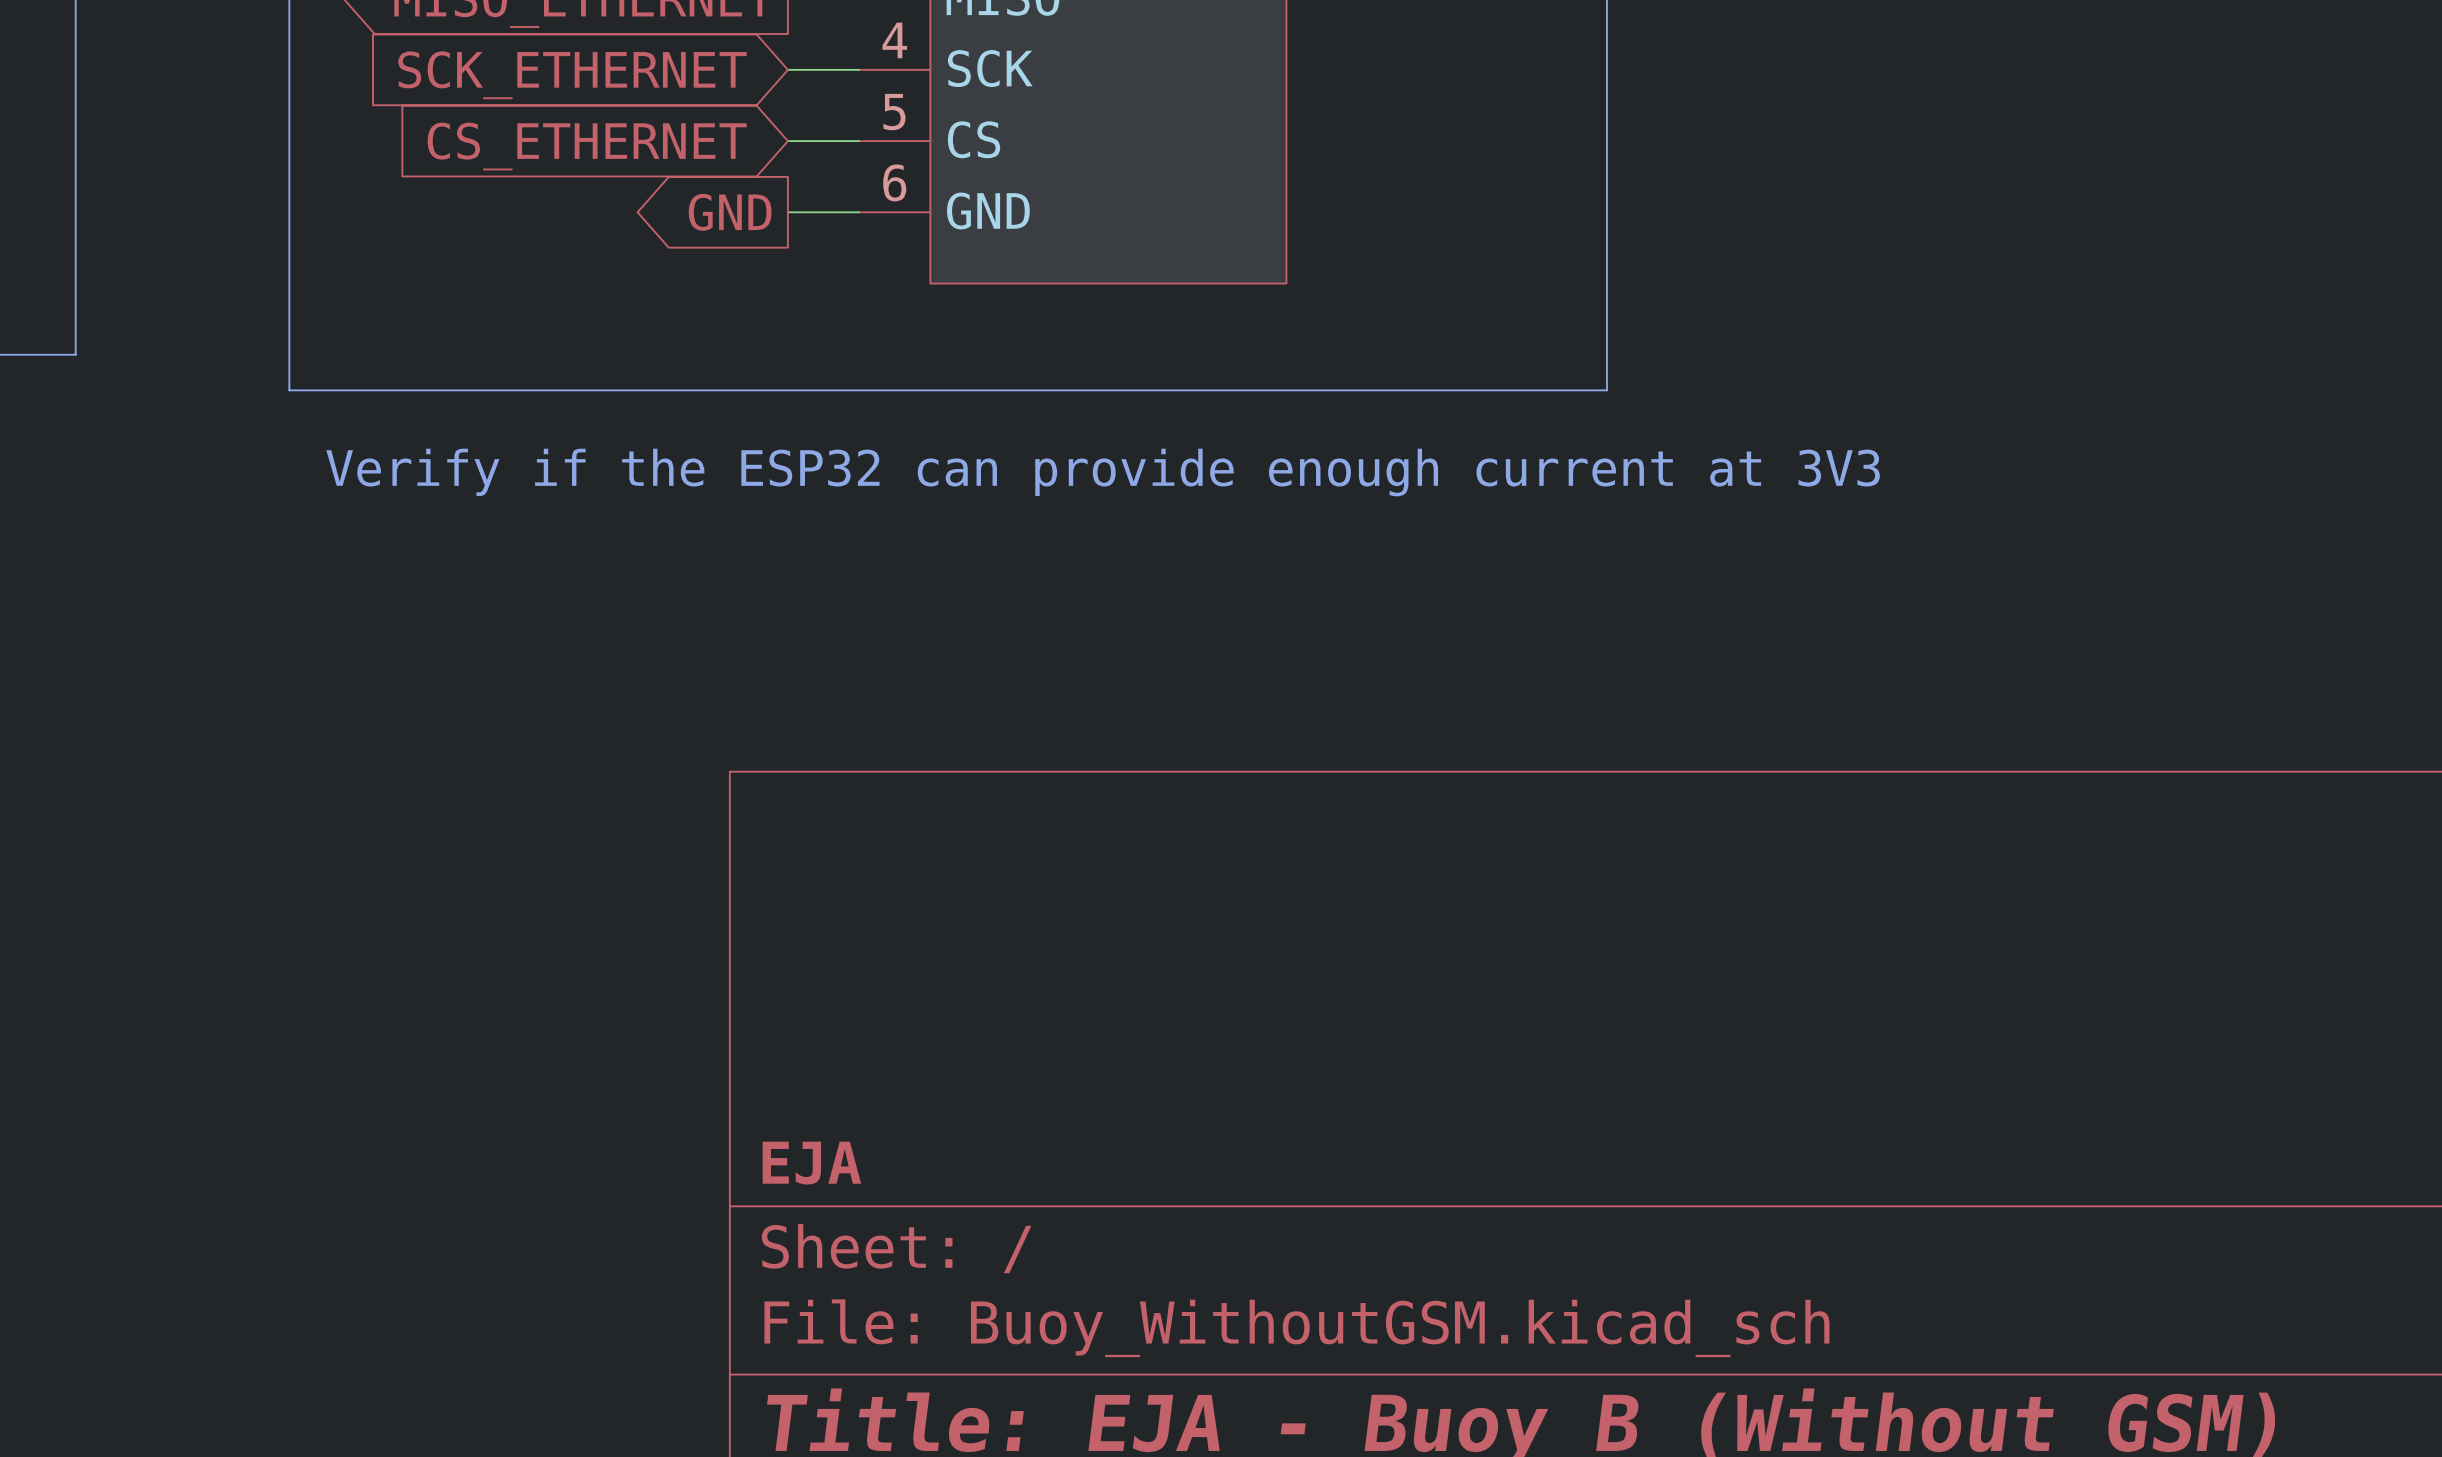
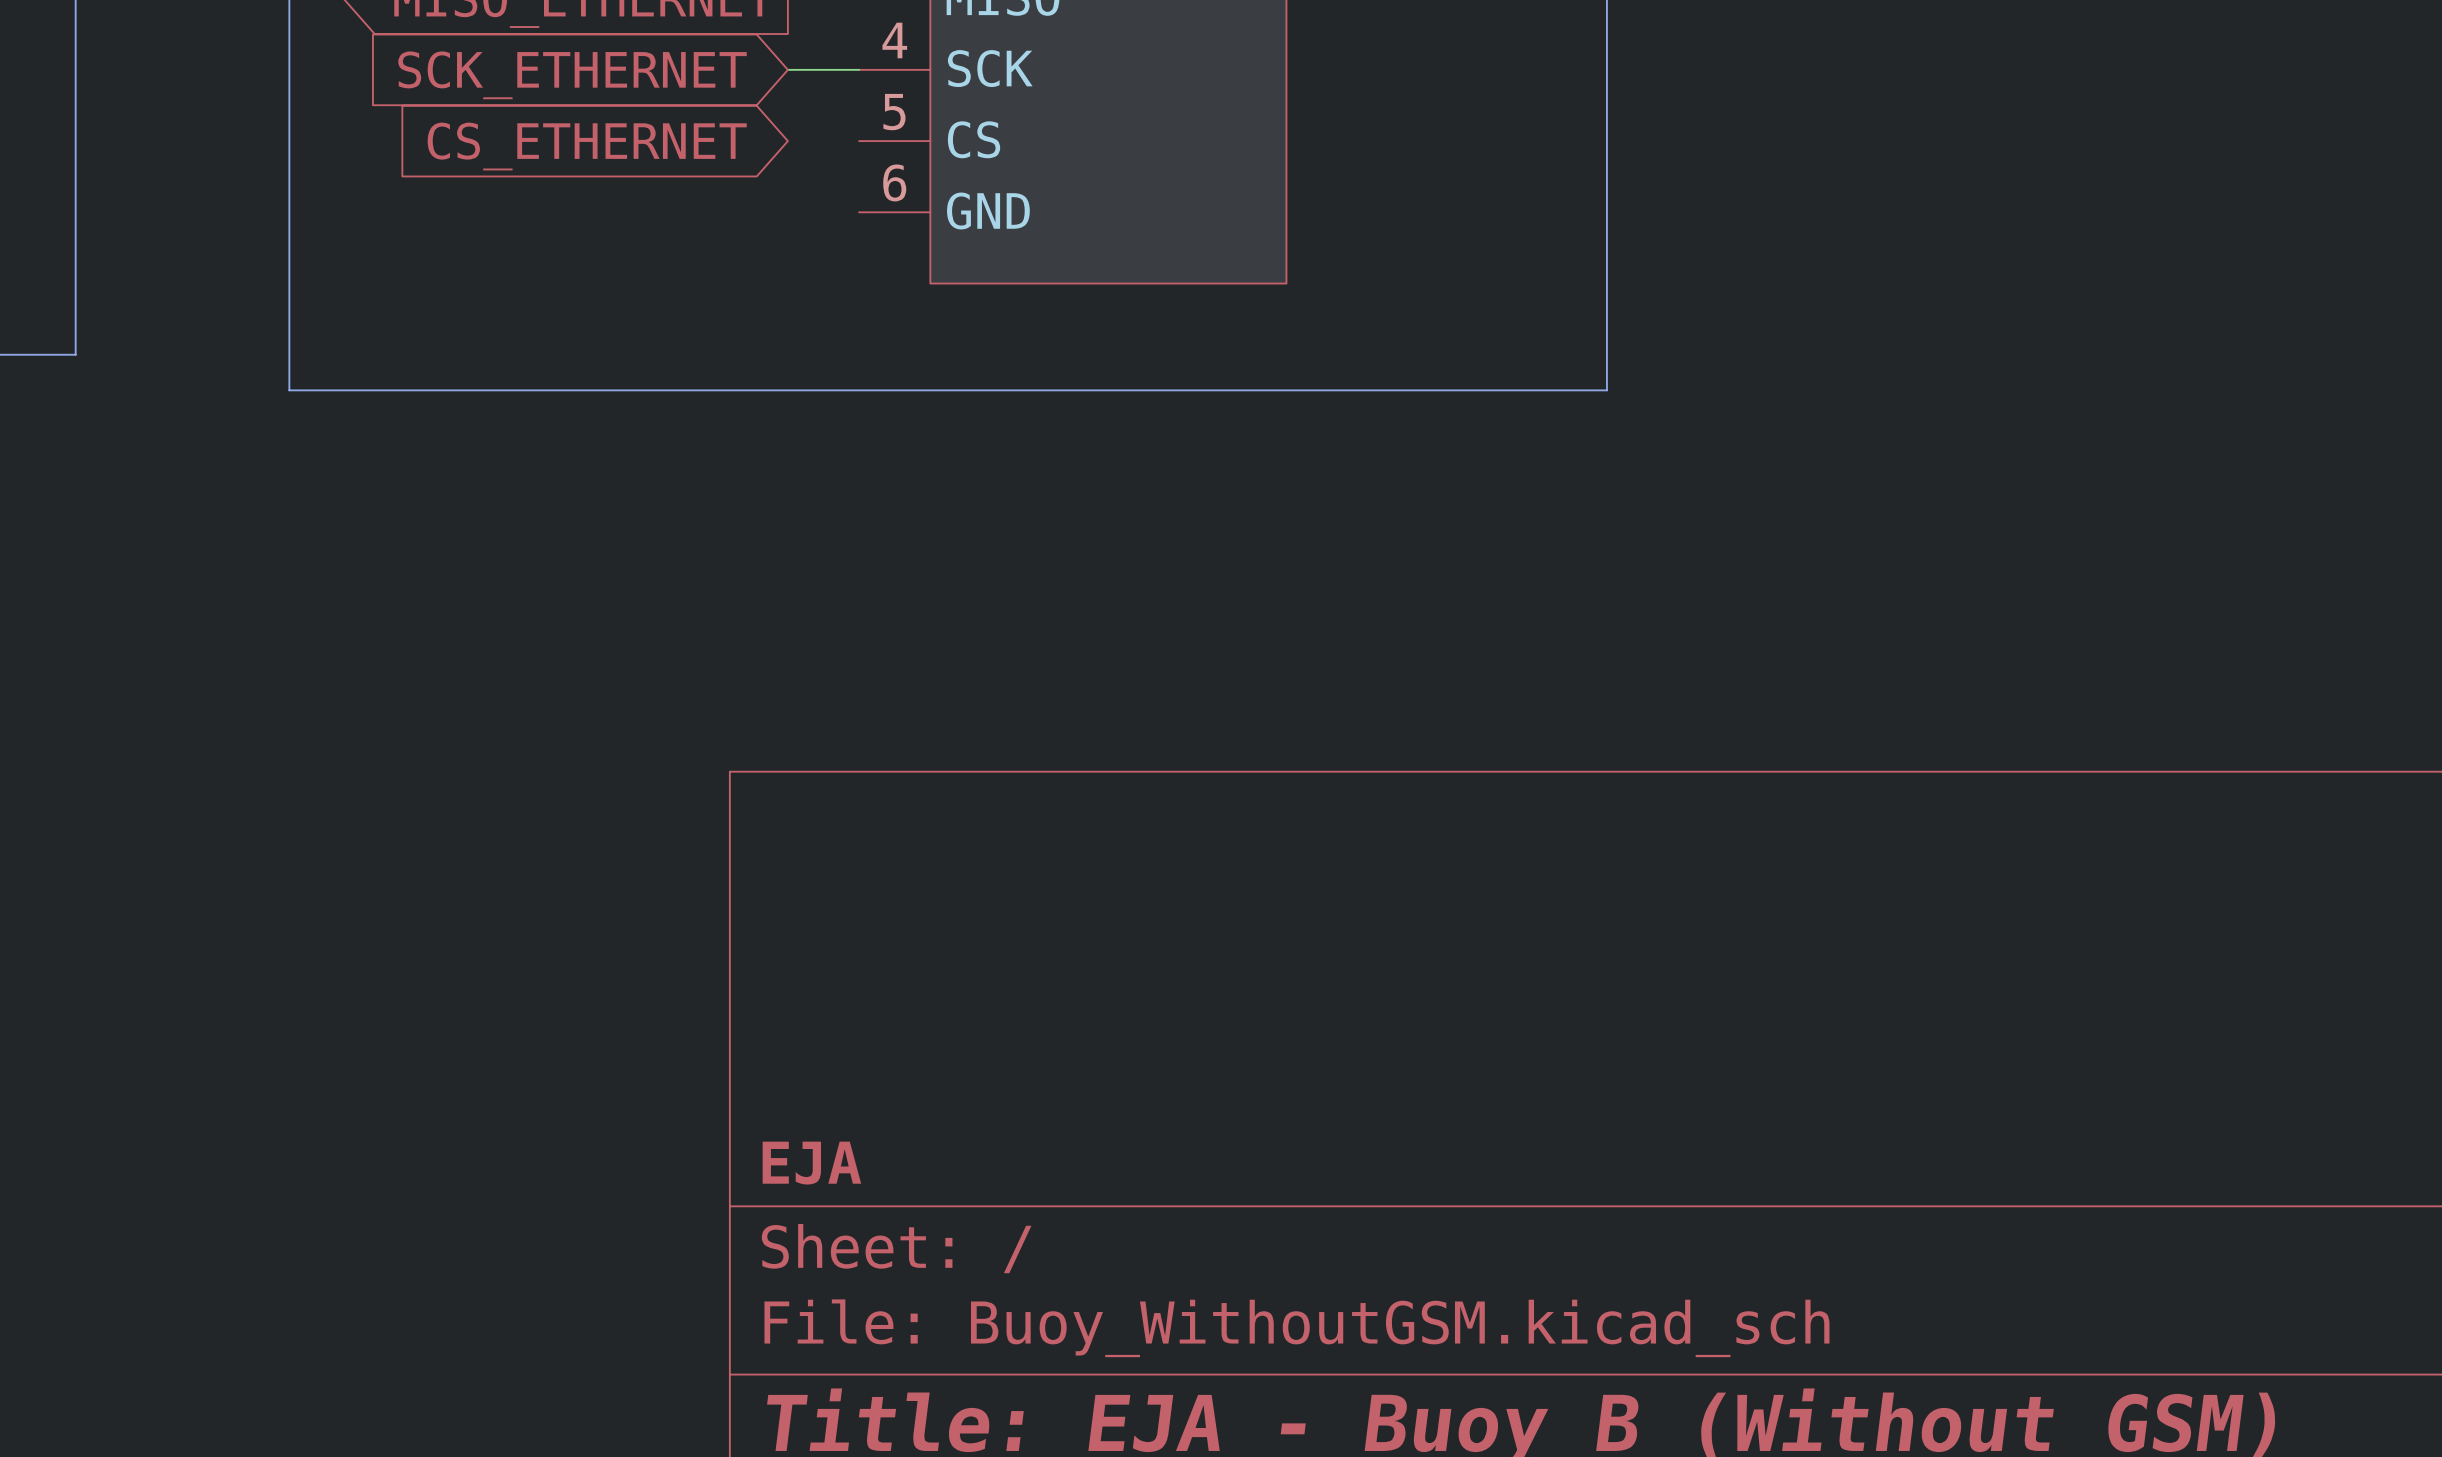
wire: (787, 141) (859, 141) -> none
global label: GND (730, 212) -> none
wire: (787, 212) (859, 212) -> none
text: Verify if the ESP32 can provide enough current at 3V3 (1103, 472) -> none

